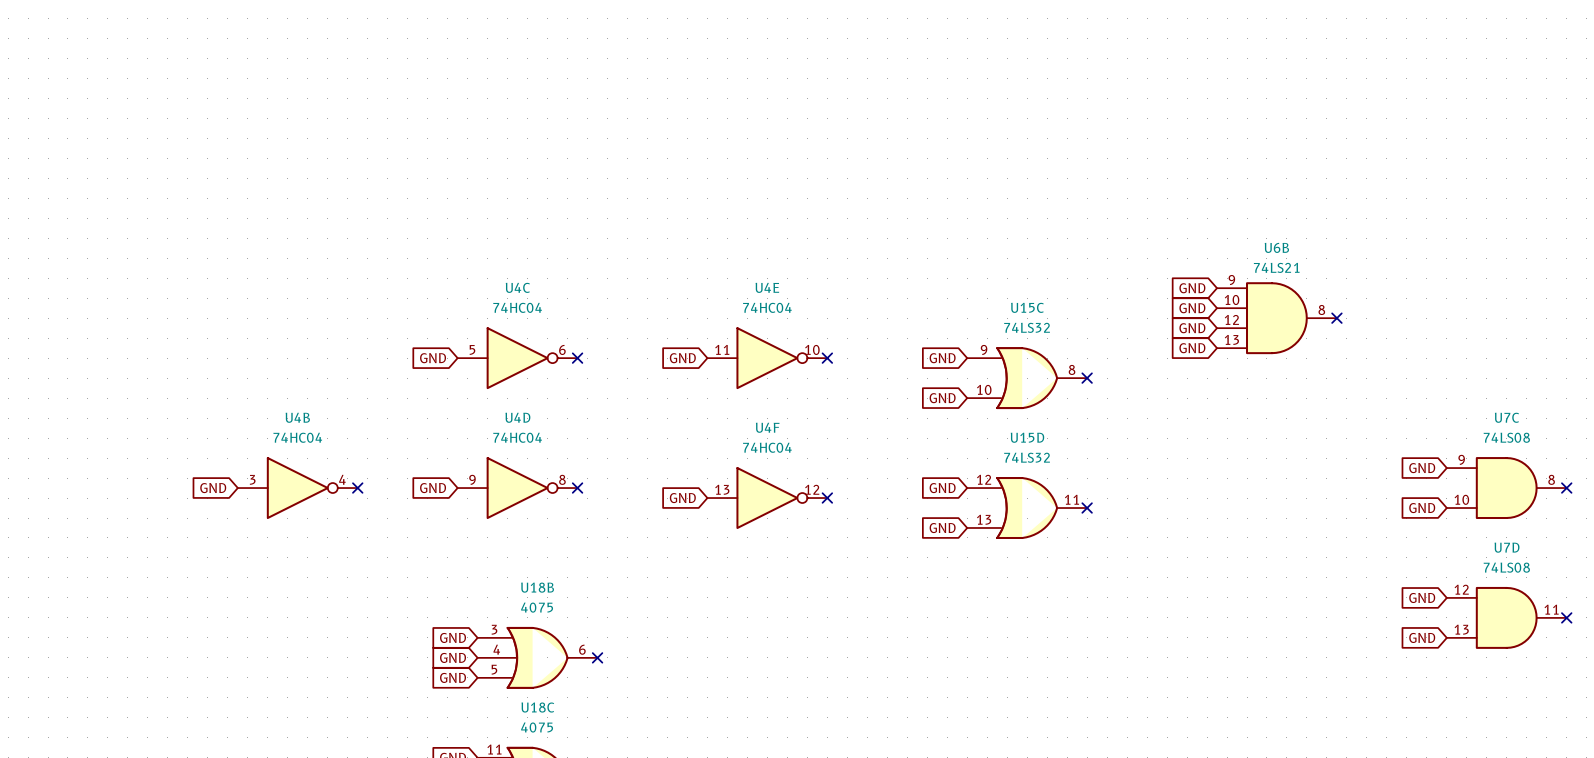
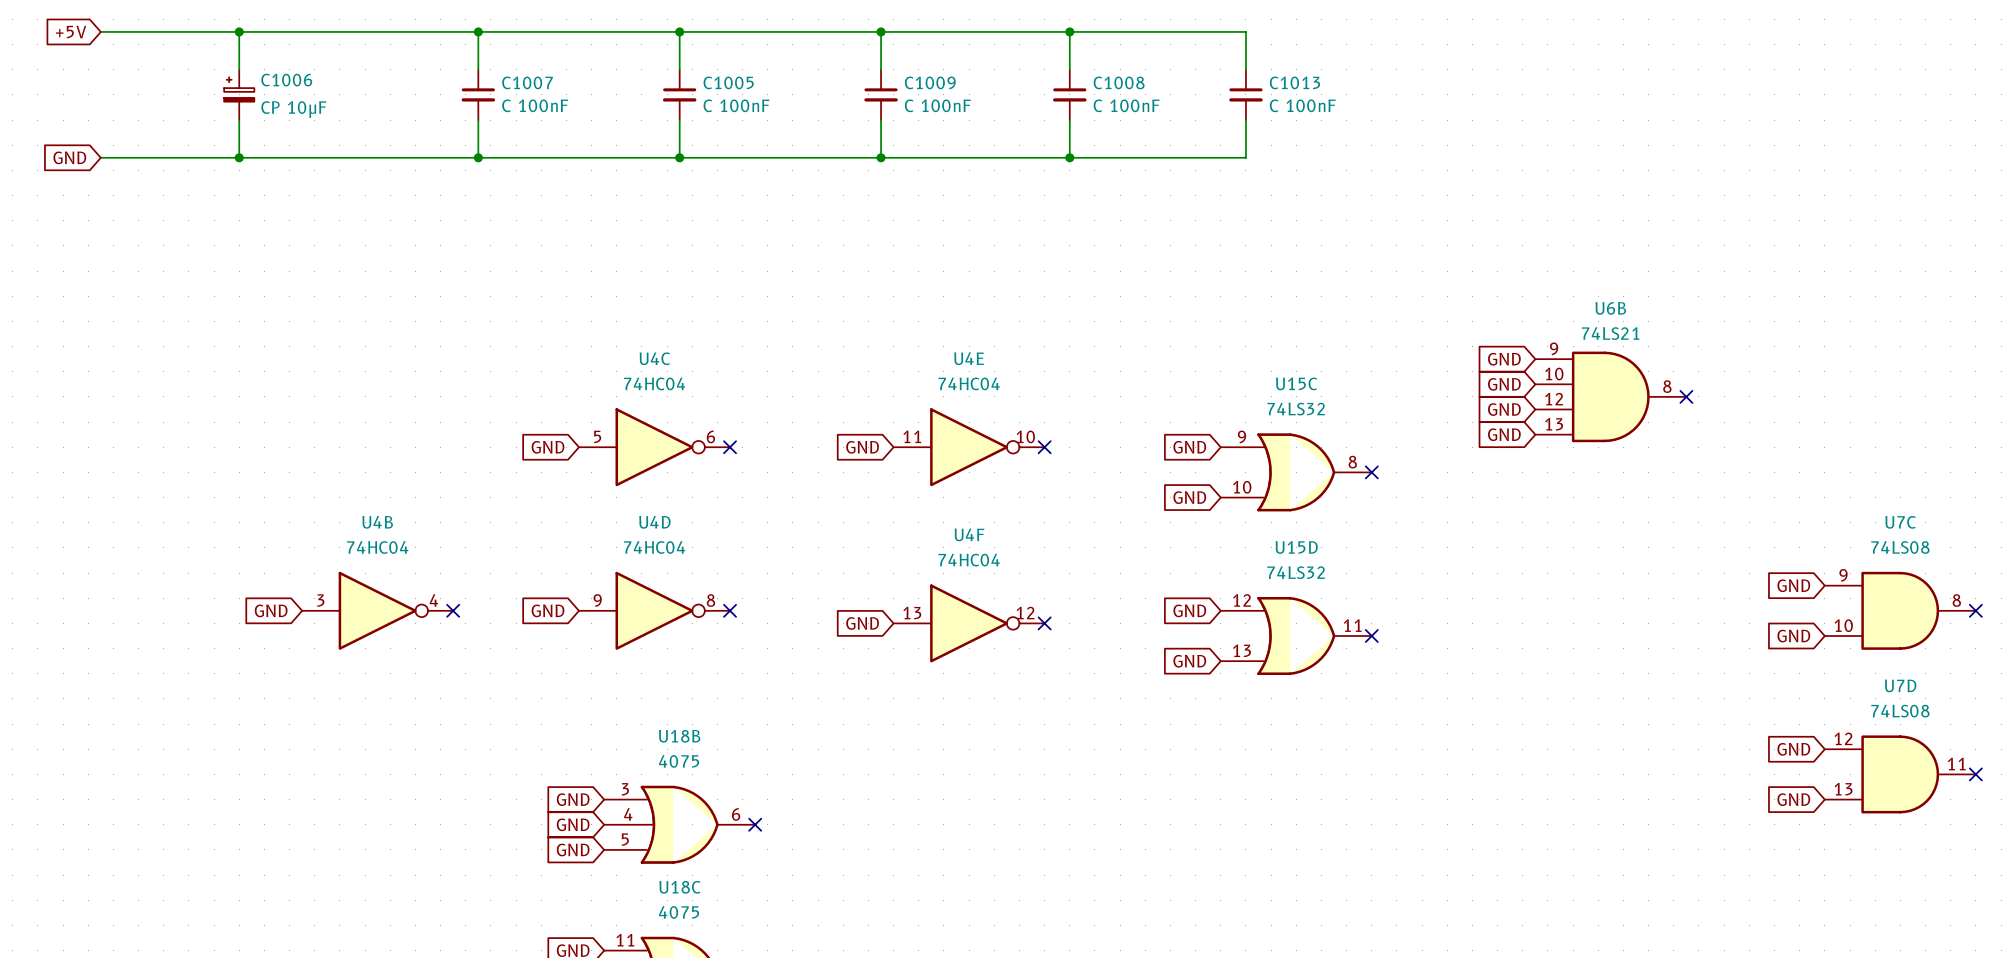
global label: none -> +5V (71, 32)
wire: none -> (100, 31) (1245, 31) (1245, 69)
wire: none -> (239, 31) (239, 69)
junction: none -> (239, 31)
wire: none -> (478, 31) (478, 69)
junction: none -> (478, 31)
wire: none -> (679, 31) (679, 69)
junction: none -> (679, 31)
wire: none -> (881, 31) (881, 69)
junction: none -> (881, 31)
wire: none -> (1069, 31) (1069, 69)
junction: none -> (1069, 31)
C1006: none -> CP 10μF (239, 94)
C1007: none -> C 100nF (478, 94)
C1005: none -> C 100nF (679, 94)
C1009: none -> C 100nF (881, 94)
C1008: none -> C 100nF (1069, 94)
C1013: none -> C 100nF (1245, 94)
wire: none -> (239, 120) (239, 157)
wire: none -> (478, 120) (478, 157)
wire: none -> (679, 120) (679, 157)
wire: none -> (881, 120) (881, 157)
wire: none -> (1069, 120) (1069, 157)
wire: none -> (1245, 120) (1245, 157) (100, 157)
global label: none -> GND (69, 157)
junction: none -> (239, 157)
junction: none -> (478, 157)
junction: none -> (679, 157)
junction: none -> (881, 157)
junction: none -> (1069, 157)

